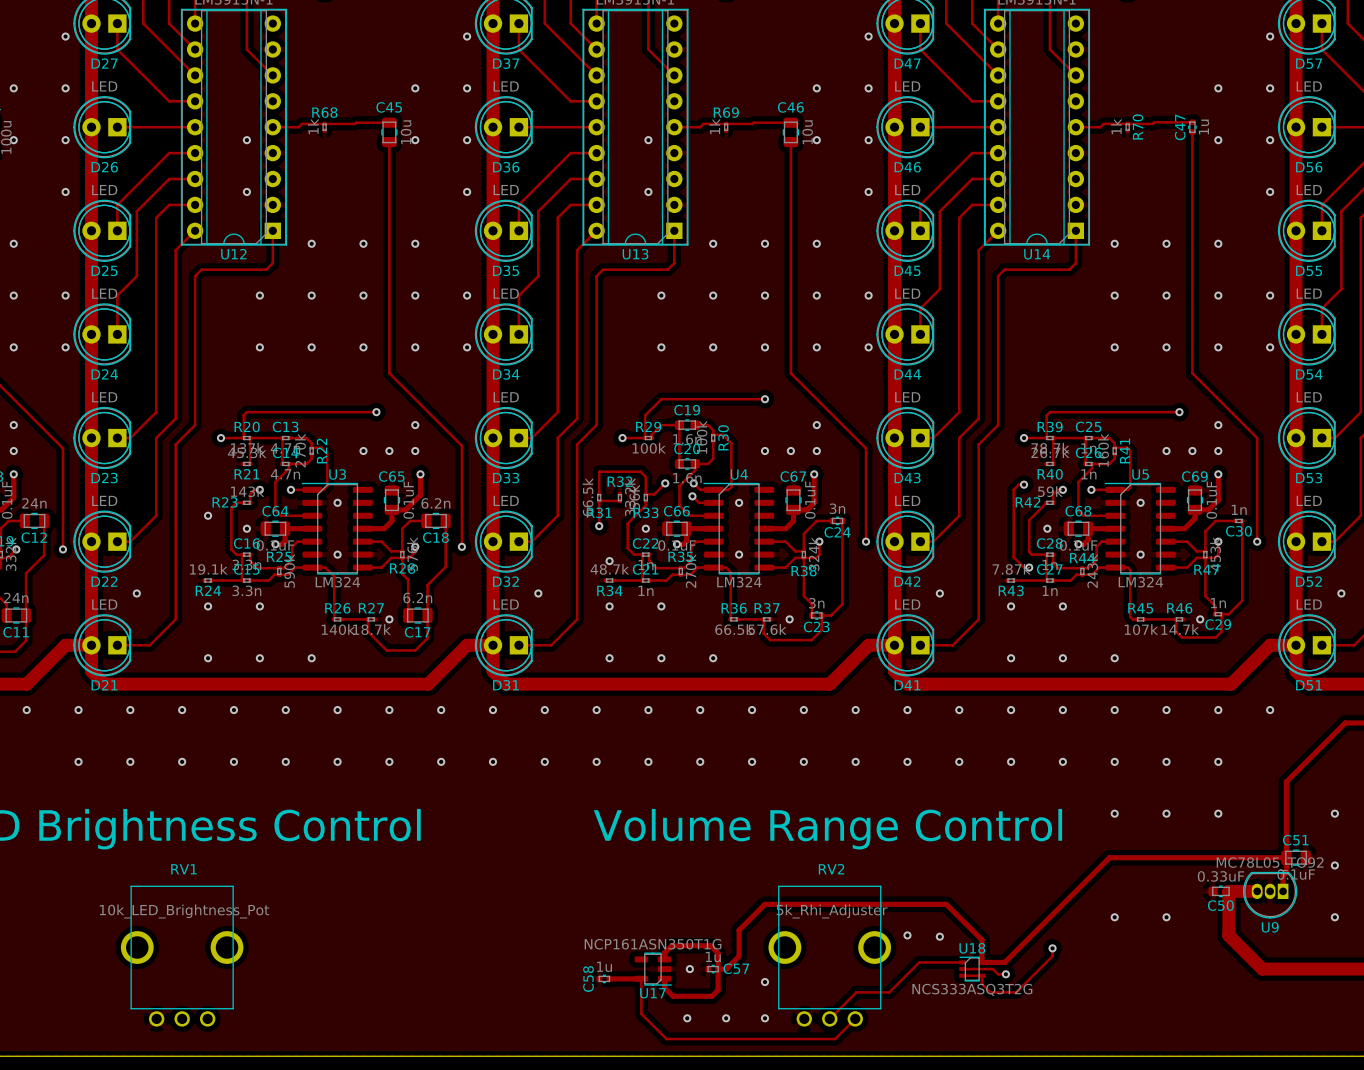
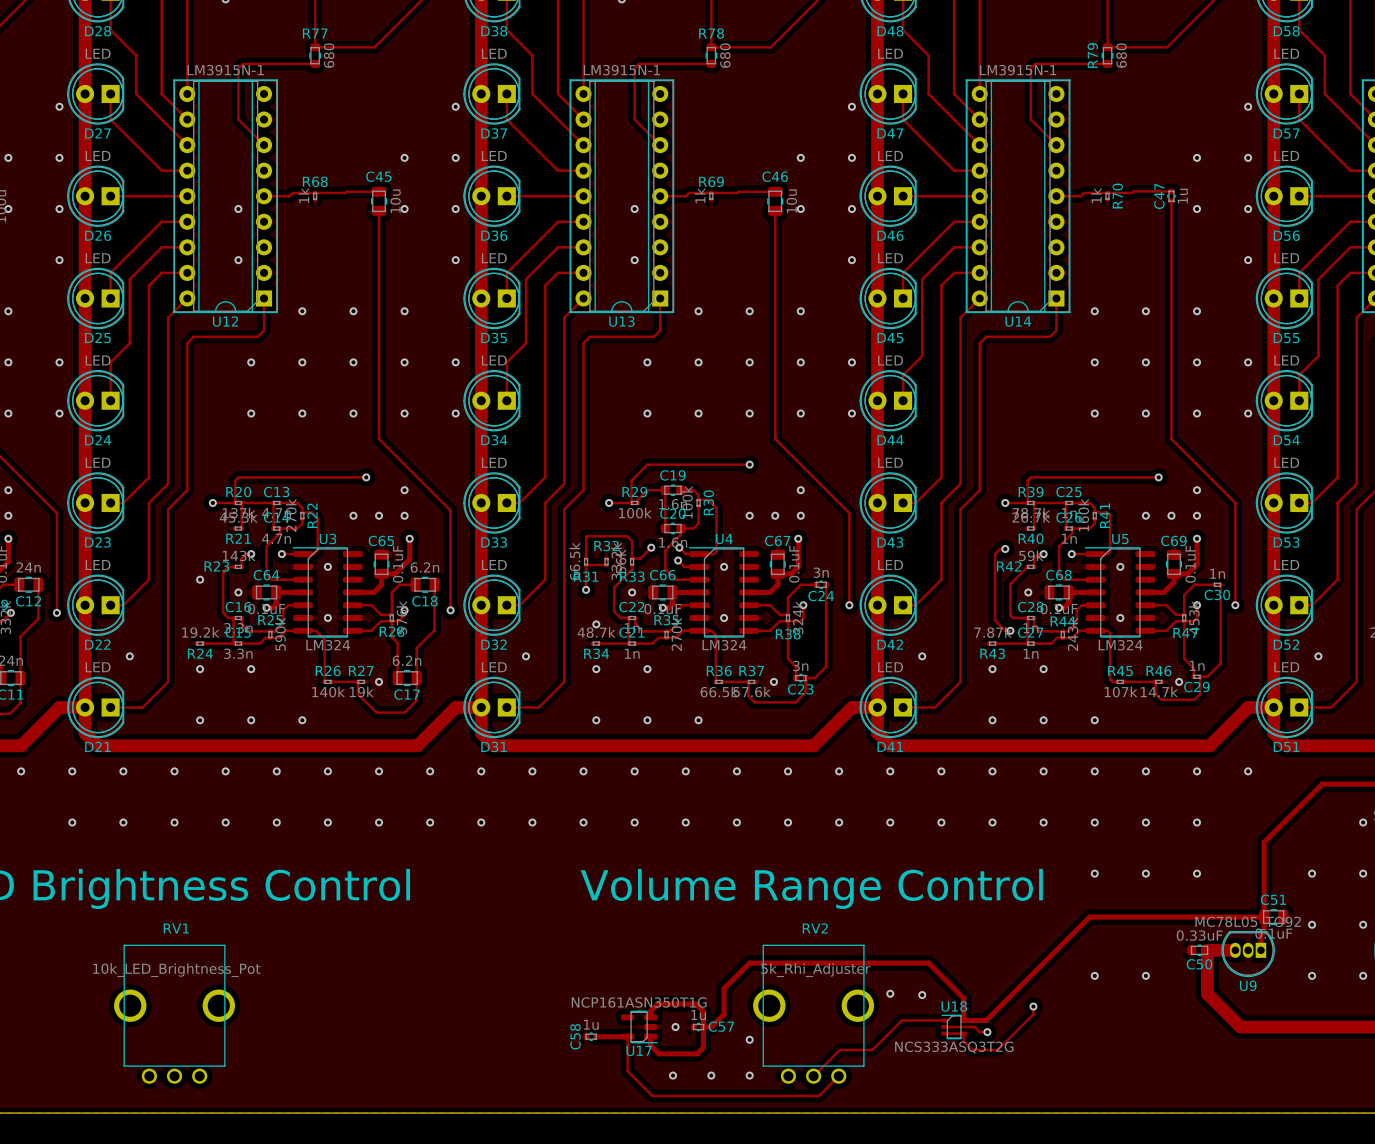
R24 value: 19.1k (208, 569) -> 19.2k (200, 632)
R27 value: 18.7k (372, 629) -> 19k (361, 691)

